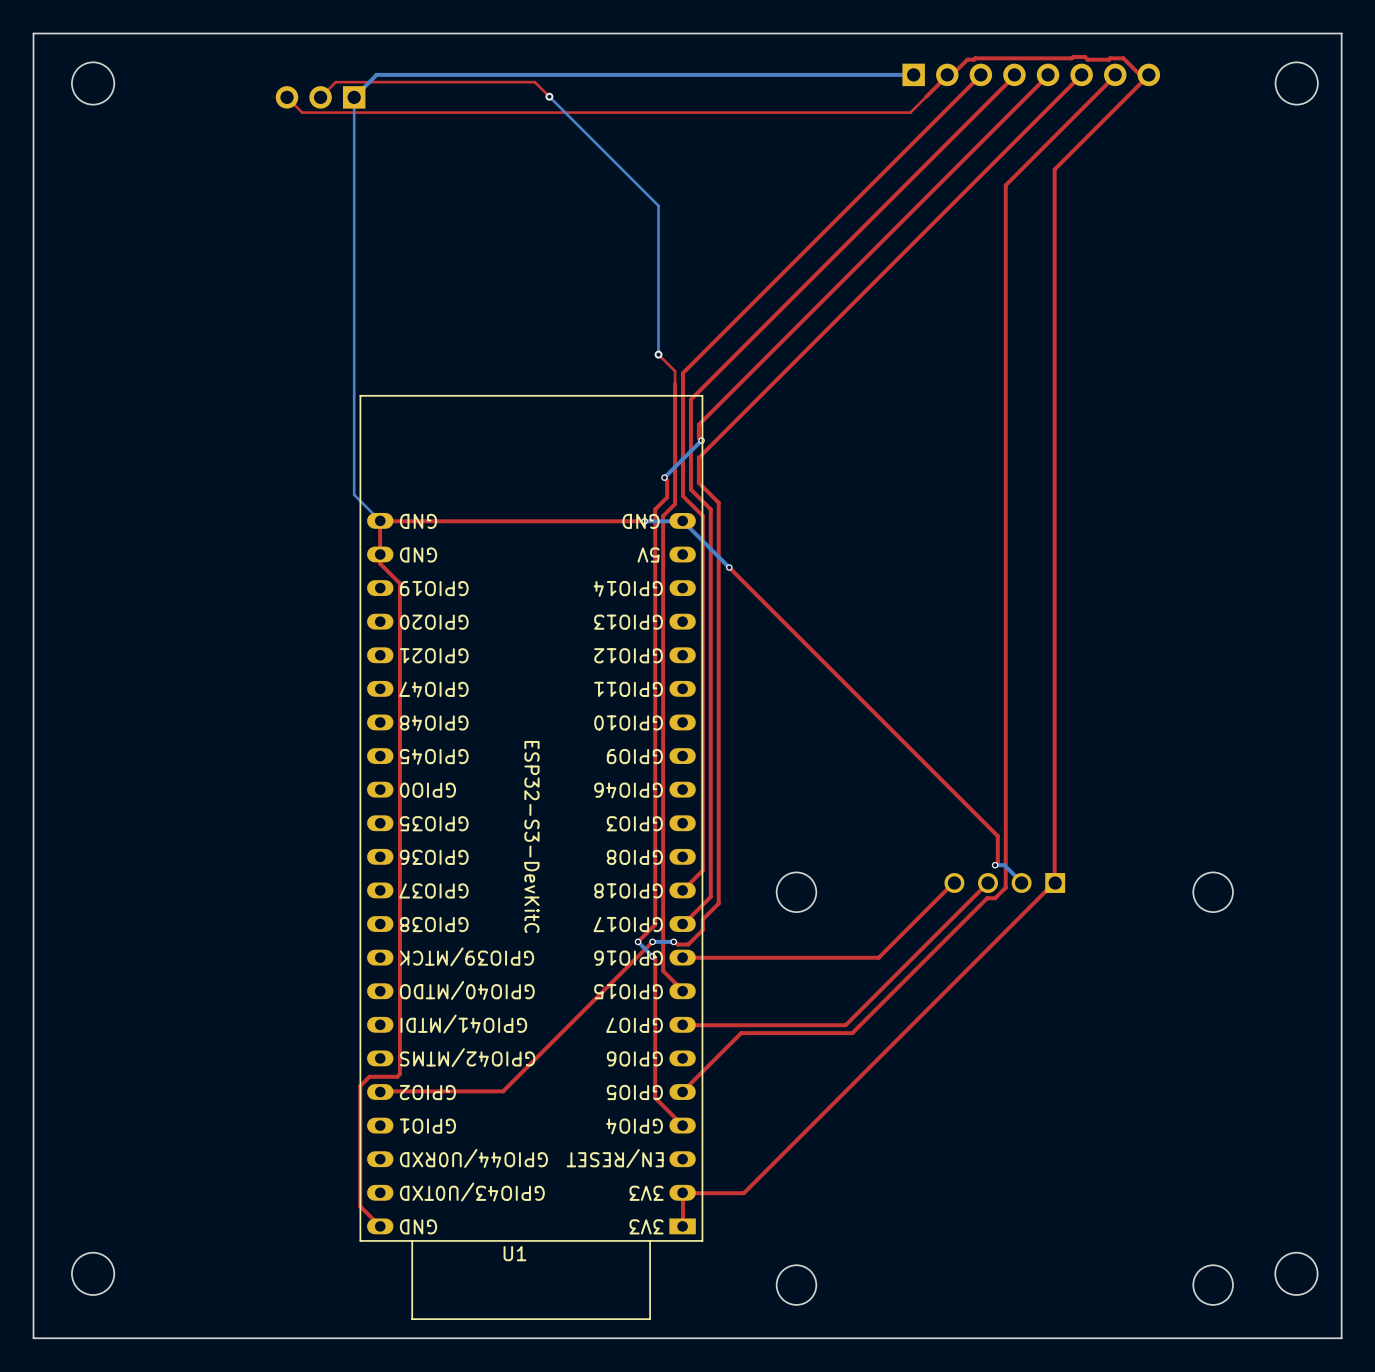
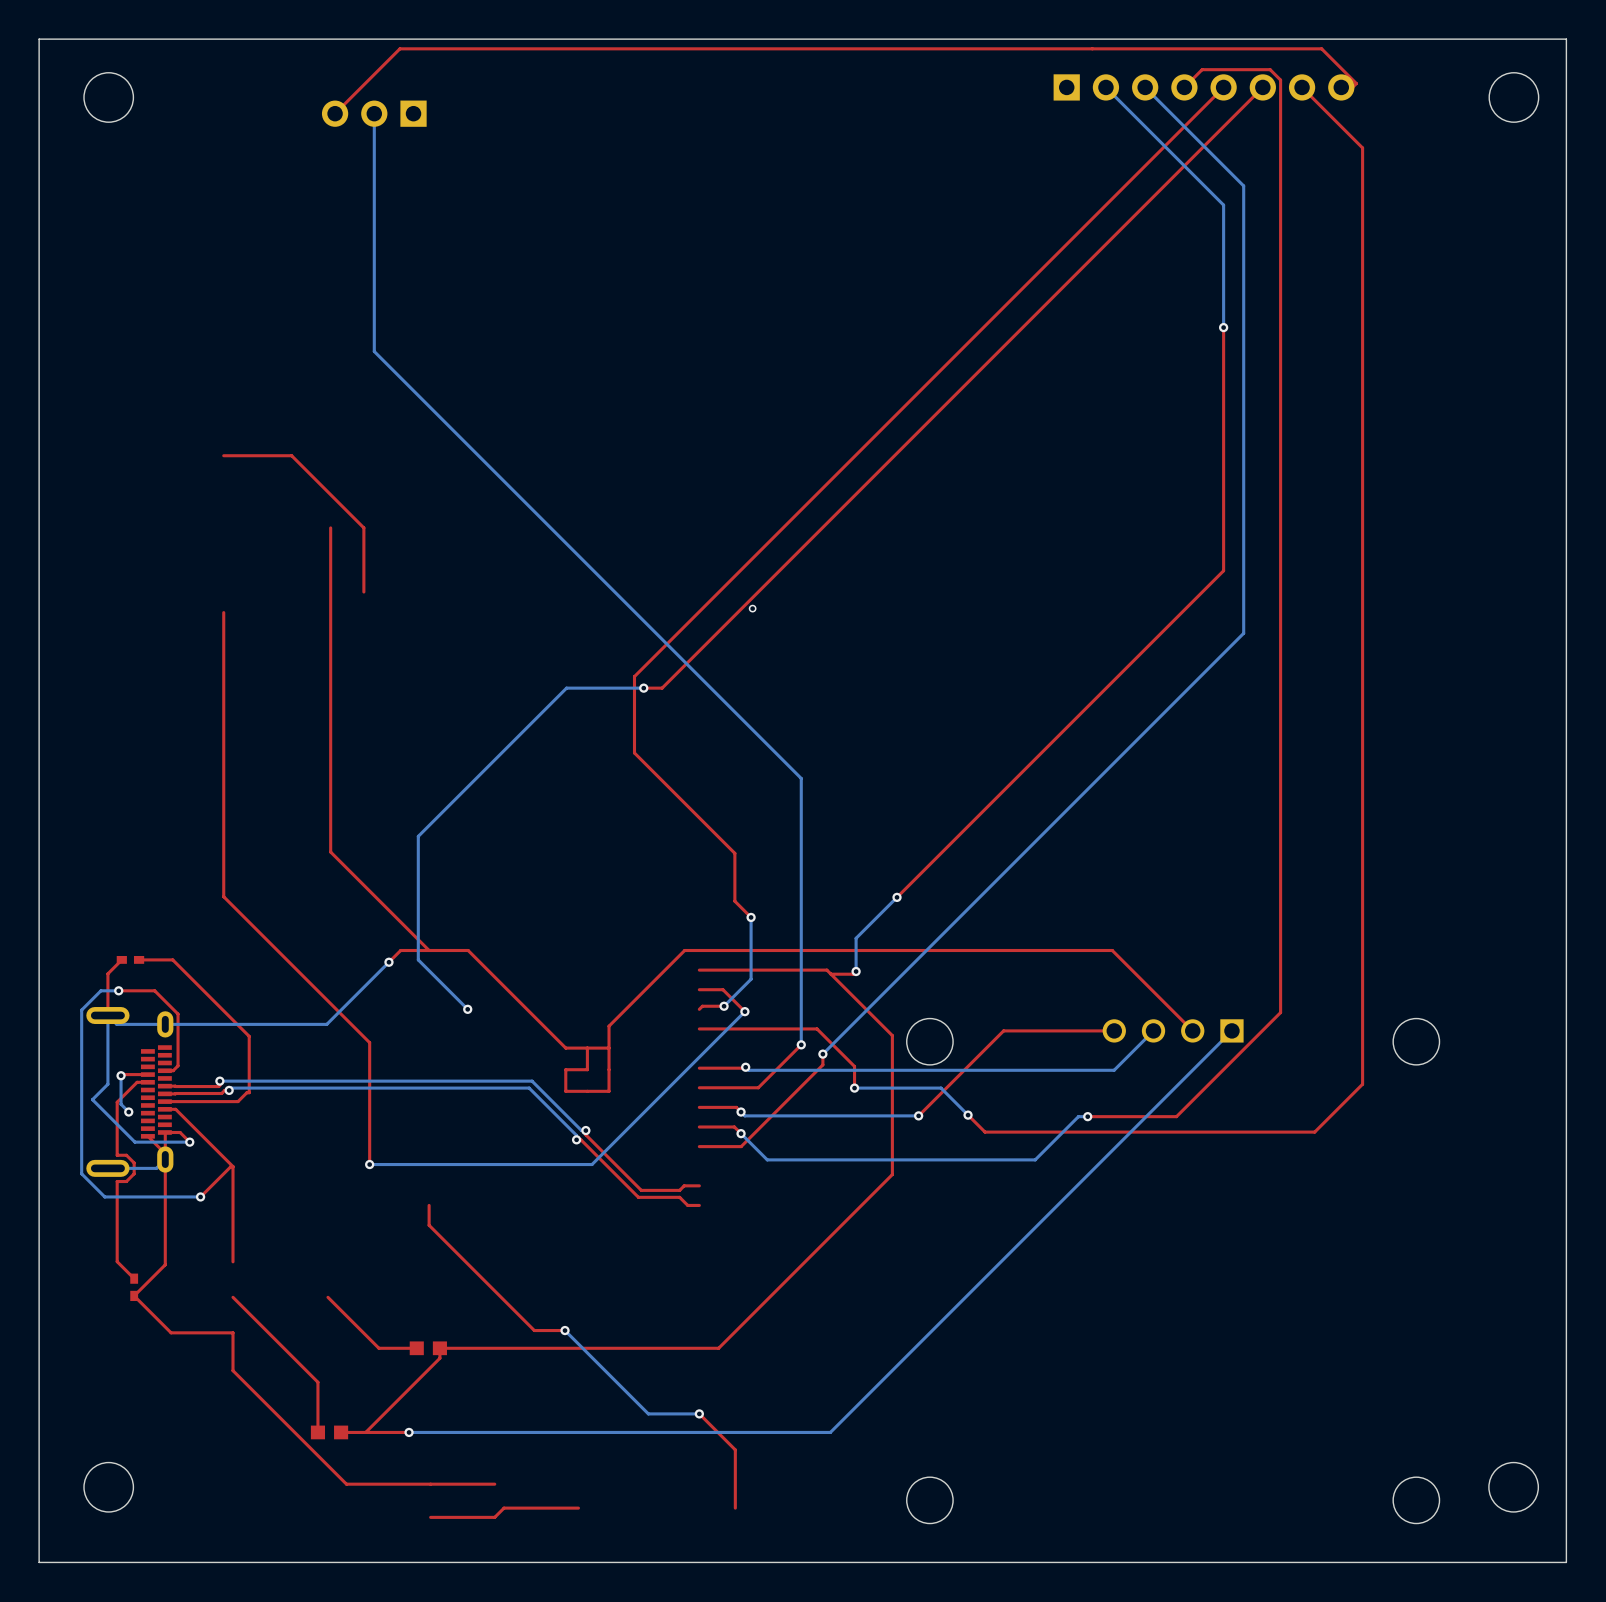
top track: (1087, 59) (1085, 57) (967, 59) (951, 75) (947, 75) (910, 112) (302, 112) (287, 97) -> (1341, 87) (1352, 87) (1356, 83) (1321, 48) (399, 48) (335, 113)
top track: (1087, 59) (1123, 58) (1144, 79) -> (1269, 69) (1202, 69) (1184, 87)
top track: none -> (1270, 69) (1280, 80) (1280, 1012) (1176, 1116) (1086, 1116)
bottom track: (913, 74) (376, 74) (354, 97) (354, 494) (380, 520) -> none
bottom track: none -> (1105, 87) (1223, 205) (1223, 327)
top track: (980, 74) (683, 373) (683, 496) (702, 515) (702, 870) (682, 890) -> none
bottom track: none -> (1145, 87) (1243, 185) (1243, 633) (822, 1054)
top track: (1014, 74) (690, 399) (690, 489) (710, 509) (710, 896) (682, 924) -> none
top track: (1048, 74) (698, 424) (698, 437) (701, 440) -> (1223, 87) (634, 676) (634, 752) (734, 853) (734, 901) (751, 917)
top track: (1081, 74) (698, 457) (698, 482) (718, 502) (718, 903) (702, 919) (702, 929) (688, 944) (677, 944) (673, 941) -> (1262, 87) (662, 688) (643, 688)
top track: (1115, 74) (1005, 185) (1005, 887) (995, 898) (987, 898) (852, 1033) (741, 1033) (682, 1092) -> (1302, 87) (1362, 147) (1362, 1084) (1314, 1132) (985, 1132) (968, 1115)
top track: (1148, 74) (1054, 169) (1054, 882) -> none
top track: (549, 96) (534, 82) (335, 82) (320, 97) -> none
bottom track: (549, 96) (658, 205) (658, 354) -> none
via: (549, 96) -> none
bottom track: none -> (374, 113) (374, 351) (801, 778) (801, 1044)
top track: none -> (1223, 327) (1223, 570) (895, 898)
via: none -> (1223, 327)
top track: (658, 354) (675, 371) (675, 504) (663, 515) (663, 970) (682, 991) -> none
via: (658, 354) -> none
top track: none -> (223, 455) (291, 455) (363, 527) (363, 592)
bottom track: (701, 440) (664, 477) -> none
via: (701, 440) -> none
top track: none -> (330, 527) (330, 852) (429, 950)
top track: (664, 477) (667, 480) (667, 497) (655, 509) (655, 924) (638, 941) -> none
via: (664, 477) -> none
top track: (380, 521) (380, 563) (399, 583) (399, 1074) (397, 1076) (369, 1076) (360, 1086) (360, 1206) (380, 1226) -> none
top track: (644, 521) (380, 521) -> none
bottom track: (683, 521) (644, 521) -> none
bottom track: (683, 521) (729, 567) -> none
top track: none -> (223, 612) (223, 896) (369, 1042) (369, 1164)
top track: (729, 567) (997, 836) (997, 862) (995, 865) -> none
via: (729, 567) -> none
bottom track: none -> (643, 688) (566, 688) (418, 836) (418, 959) (467, 1009)
via: none -> (643, 688)
bottom track: none -> (897, 897) (856, 938) (856, 971)
via: none -> (897, 897)
bottom track: none -> (751, 917) (751, 979) (724, 1006)
via: none -> (751, 917)
top track: none -> (121, 959) (107, 973) (107, 1015)
part: none -> (130, 959)
top track: none -> (139, 959) (172, 959) (249, 1036) (249, 1092) (238, 1101) (164, 1101)
bottom track: none -> (391, 959) (326, 1024) (116, 1024) (107, 1015) (107, 1084) (92, 1099) (134, 1142) (189, 1142)
top track: none -> (388, 962) (400, 950) (468, 950) (565, 1048) (609, 1048)
via: none -> (388, 962)
top track: none -> (699, 970) (826, 970) (892, 1035) (892, 1174) (718, 1348) (439, 1348) (439, 1358) (365, 1432)
top track: none -> (856, 971) (853, 974) (831, 974)
via: none -> (856, 971)
top track: none -> (699, 989) (722, 989) (744, 1011)
top track: none -> (118, 990) (154, 990) (178, 1014) (178, 1065) (173, 1070) (164, 1070)
bottom track: none -> (118, 990) (100, 990) (81, 1010) (81, 1173) (104, 1196) (201, 1196)
via: none -> (118, 990)
U1: ESP32-S3-DevKitC (531, 857) -> none
top track: none -> (724, 1006) (702, 1006) (699, 1009)
via: none -> (724, 1006)
via: none -> (467, 1009)
bottom track: (995, 865) (1004, 865) (1021, 883) -> none
via: (995, 865) -> none
bottom track: none -> (744, 1011) (592, 1164) (369, 1164)
via: none -> (744, 1011)
top track: none -> (699, 1028) (817, 1028) (854, 1066) (854, 1088)
top track: (1054, 882) (743, 1193) (683, 1193) -> none
top track: (954, 883) (878, 957) (682, 957) -> (1114, 1030) (1003, 1030) (918, 1115)
top track: (988, 883) (845, 1025) (682, 1024) -> none
bottom track: none -> (1153, 1030) (1114, 1070) (748, 1070) (745, 1067)
top track: none -> (1192, 1030) (1112, 950) (684, 950) (609, 1026) (609, 1091) (565, 1091) (565, 1069) (587, 1069) (587, 1048)
bottom track: none -> (1231, 1030) (830, 1432) (409, 1432)
top track: none -> (801, 1044) (758, 1087) (699, 1087)
via: none -> (801, 1044)
top track: none -> (822, 1054) (822, 1064) (741, 1146) (699, 1146)
via: none -> (822, 1054)
top track: none -> (745, 1067) (699, 1068)
via: none -> (745, 1067)
top track: none -> (147, 1074) (121, 1075)
bottom track: none -> (121, 1075) (121, 1104) (128, 1112)
via: none -> (121, 1075)
top track: none -> (219, 1081) (218, 1086) (164, 1086)
bottom track: none -> (219, 1081) (532, 1081) (581, 1130) (585, 1130)
via: none -> (219, 1081)
top track: none -> (147, 1082) (137, 1082) (117, 1102) (117, 1155) (126, 1155) (134, 1162) (134, 1173) (126, 1181) (117, 1181) (117, 1261) (134, 1278)
bottom track: none -> (854, 1088) (941, 1088) (968, 1115)
via: none -> (854, 1088)
top track: none -> (229, 1090) (224, 1090) (221, 1093) (164, 1093)
bottom track: none -> (229, 1090) (231, 1088) (529, 1088) (576, 1135) (576, 1139)
via: none -> (229, 1090)
part: none -> (129, 1091)
bottom track: (638, 941) (652, 956) -> none
via: (638, 941) -> none
top track: (652, 941) (503, 1091) (380, 1092) -> none
via: (652, 941) -> none
bottom track: (673, 941) (652, 941) -> none
via: (673, 941) -> none
top track: none -> (699, 1107) (736, 1107) (741, 1112)
top track: none -> (164, 1109) (175, 1109) (233, 1166)
via: none -> (128, 1112)
bottom track: none -> (741, 1112) (744, 1115) (918, 1115)
via: none -> (741, 1112)
via: none -> (918, 1115)
via: none -> (968, 1115)
top track: (652, 956) (655, 959) (655, 1097) (682, 1125) -> none
via: (652, 956) -> none
bottom track: none -> (1087, 1116) (1078, 1116) (1035, 1159) (767, 1159) (741, 1133)
via: none -> (1087, 1116)
top track: none -> (699, 1127) (734, 1127) (741, 1133)
top track: none -> (585, 1130) (585, 1134) (641, 1190) (679, 1190) (684, 1185) (699, 1185)
via: none -> (585, 1130)
via: none -> (741, 1133)
top track: none -> (147, 1136) (165, 1153)
top track: none -> (576, 1139) (580, 1139) (638, 1197) (679, 1197) (687, 1205) (699, 1205)
via: none -> (576, 1139)
top track: none -> (189, 1142) (180, 1132) (164, 1132) (165, 1264) (134, 1295) (171, 1332) (233, 1332) (233, 1370) (346, 1484) (494, 1484)
via: none -> (189, 1142)
bottom track: none -> (165, 1159) (156, 1168) (107, 1168)
via: none -> (369, 1164)
top track: none -> (233, 1166) (233, 1261)
top track: none -> (233, 1166) (200, 1196)
via: none -> (200, 1196)
top track: none -> (429, 1205) (429, 1225) (534, 1330) (565, 1330)
part: none -> (134, 1287)
top track: none -> (233, 1297) (317, 1382) (317, 1432)
top track: none -> (327, 1297) (378, 1348) (416, 1348)
bottom track: none -> (565, 1330) (648, 1413) (699, 1413)
via: none -> (565, 1330)
part: none -> (428, 1348)
top track: (683, 1193) (682, 1226) -> none
top track: none -> (699, 1413) (735, 1449) (735, 1508)
via: none -> (699, 1413)
part: none -> (329, 1432)
top track: none -> (409, 1432) (341, 1432)
via: none -> (409, 1432)
top track: none -> (578, 1508) (504, 1508) (494, 1517) (430, 1517)

